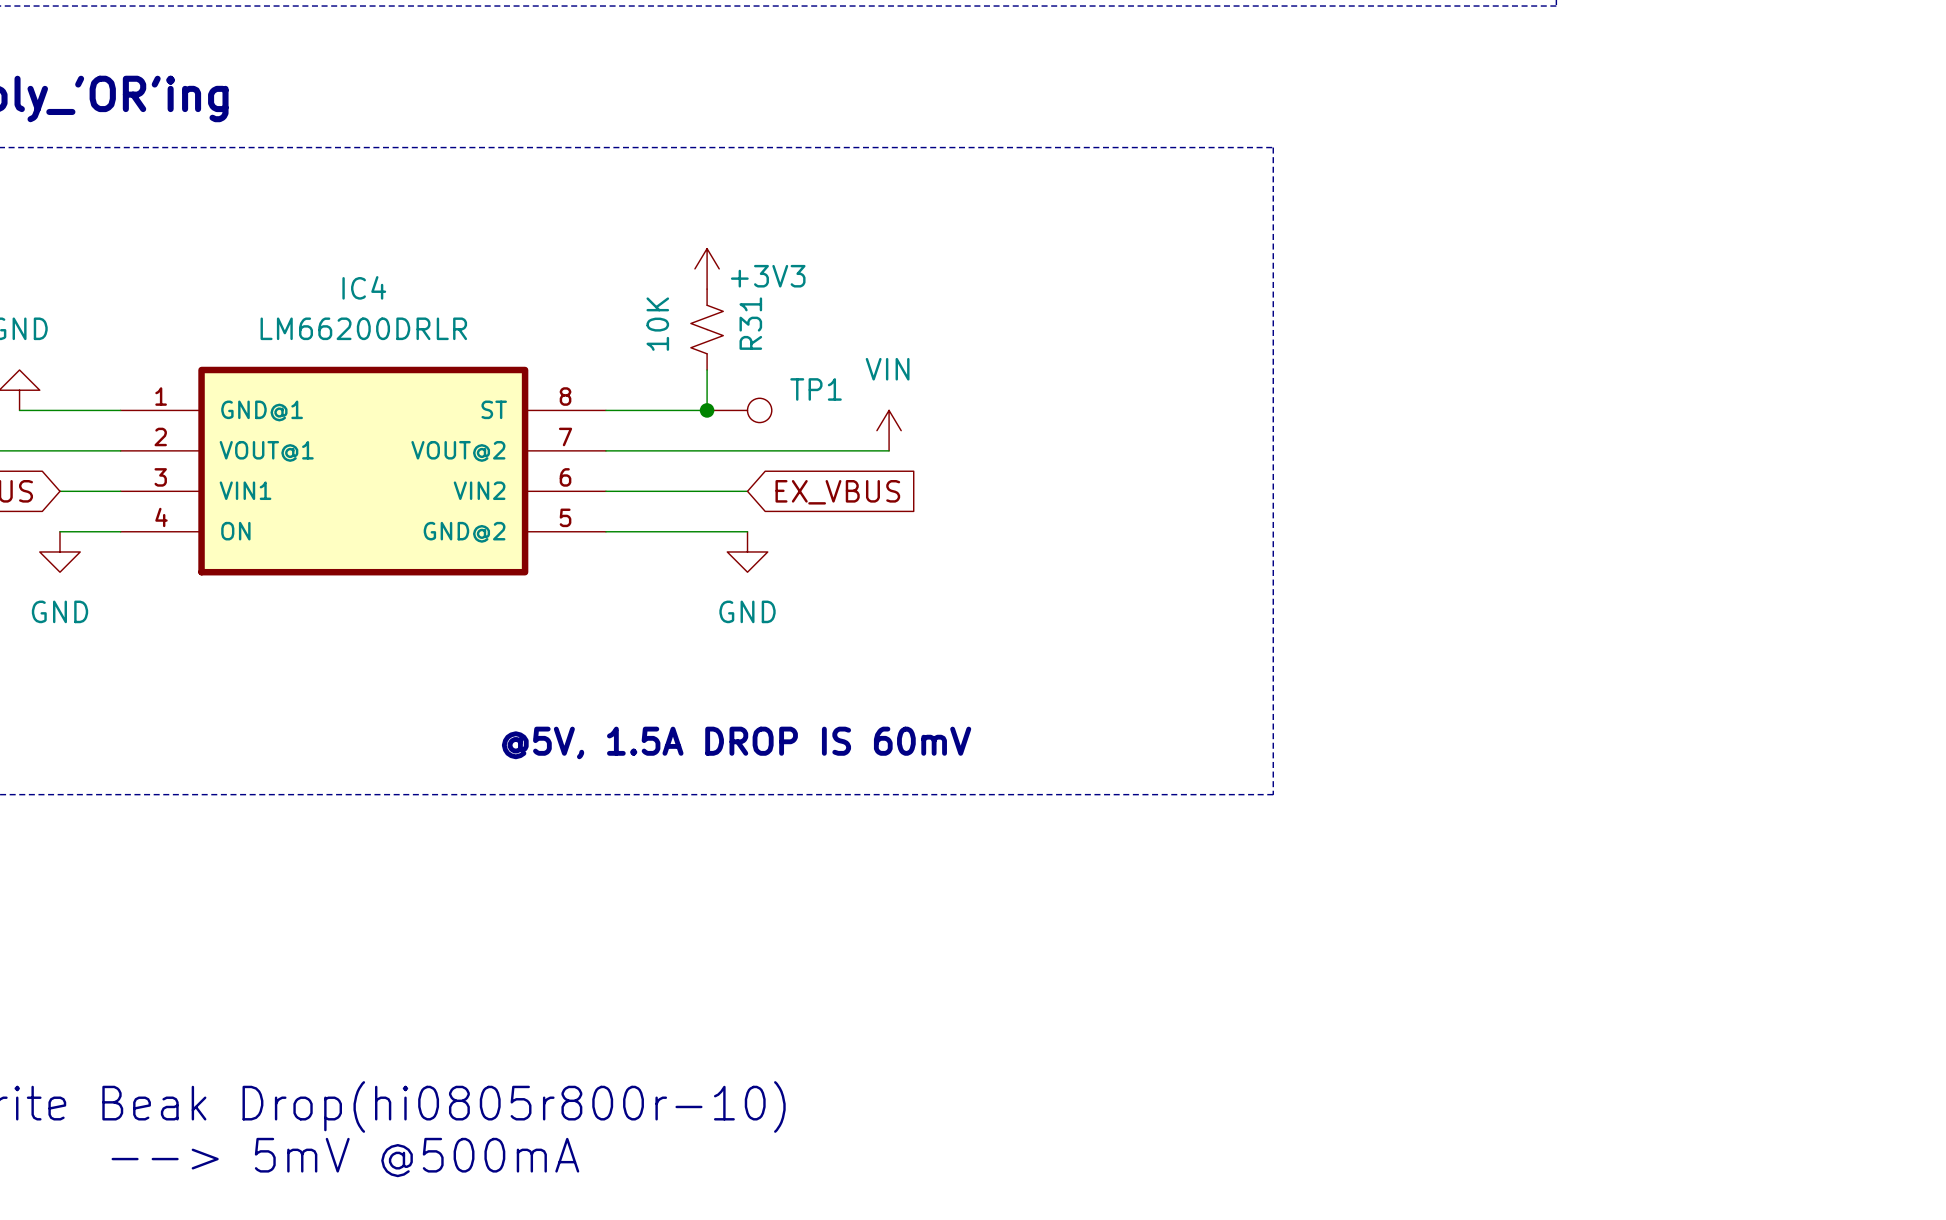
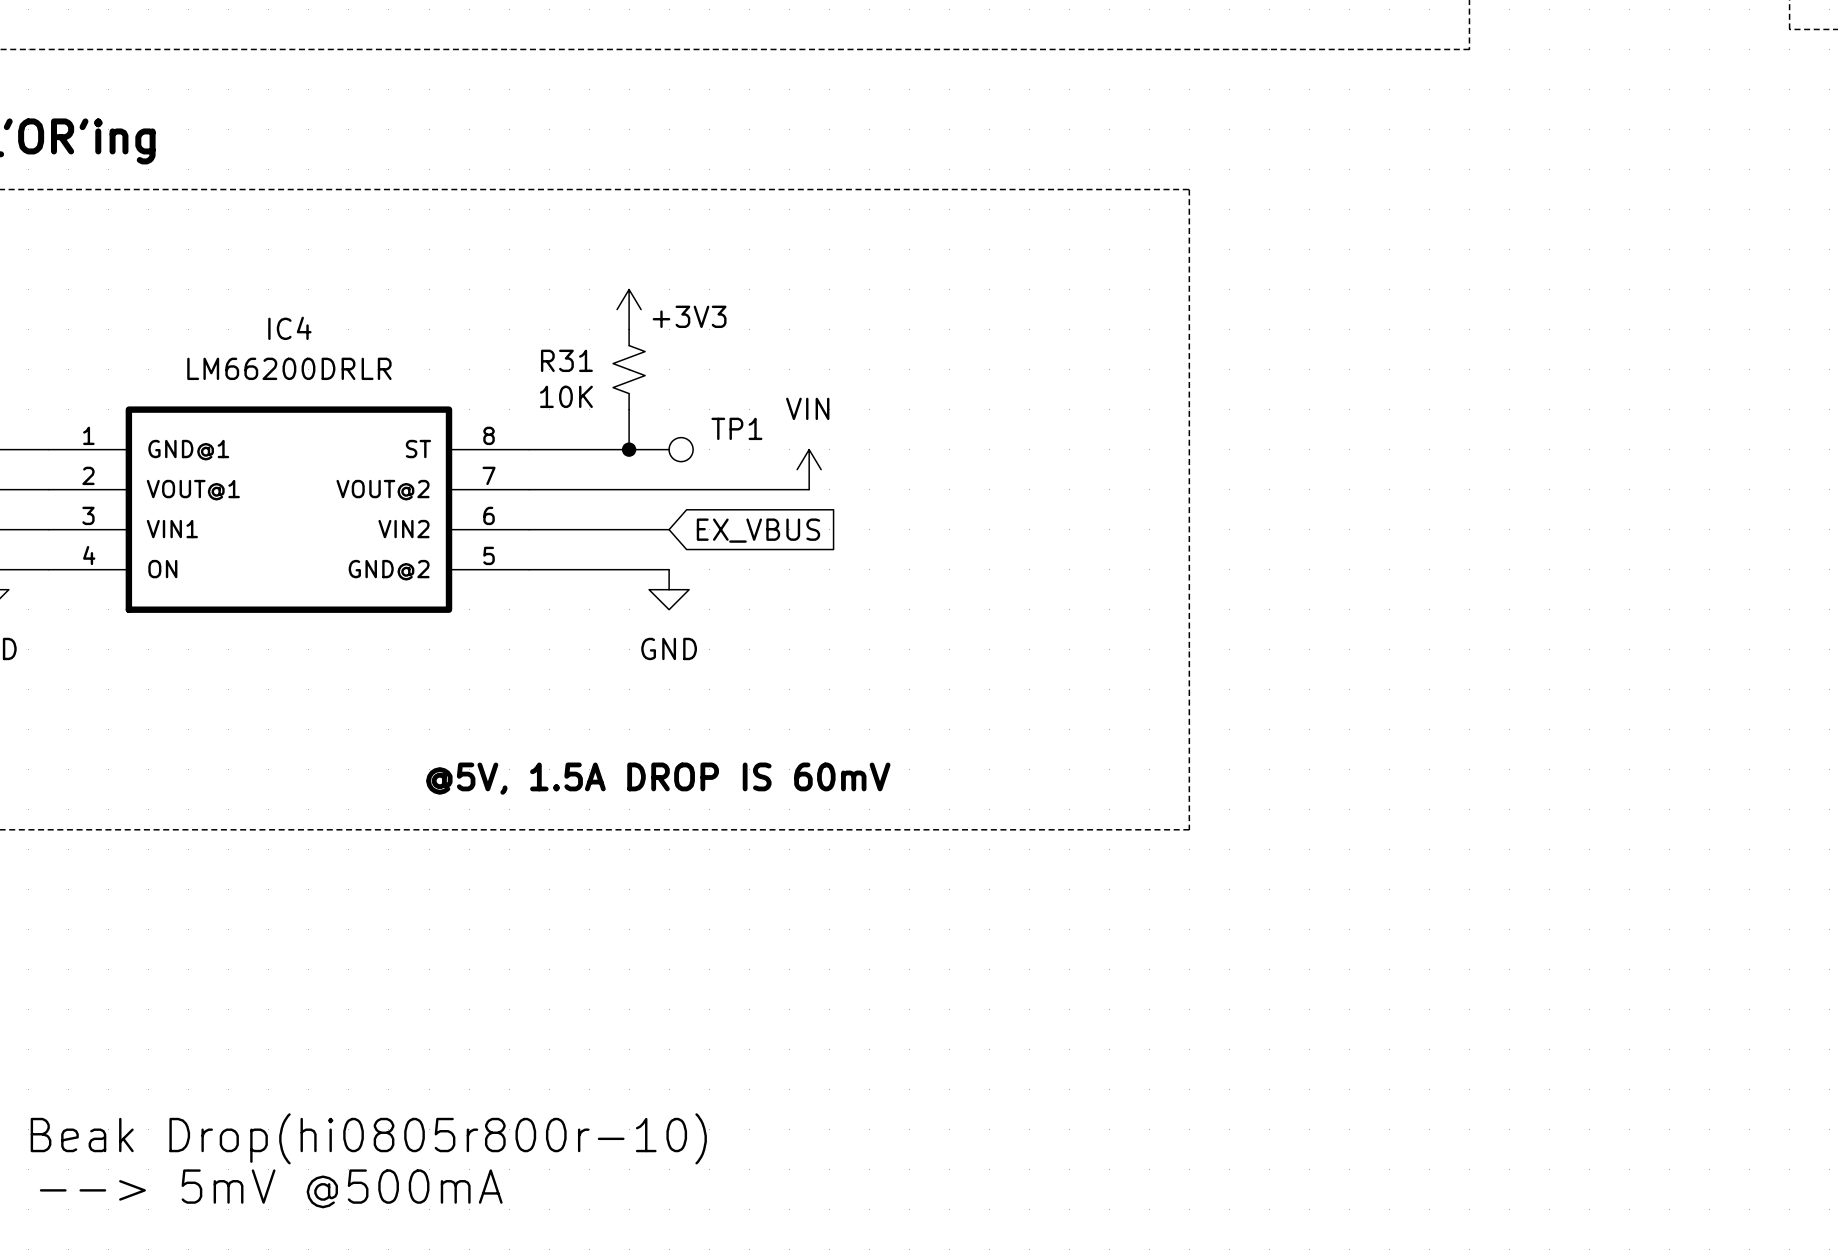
R31 name rotation: 0° (750, 323) -> 90° clockwise (566, 360)
R31 name position: R31 (750, 323) -> R31 (566, 360)
R31 value rotation: 0° (657, 324) -> 90° clockwise (566, 396)

